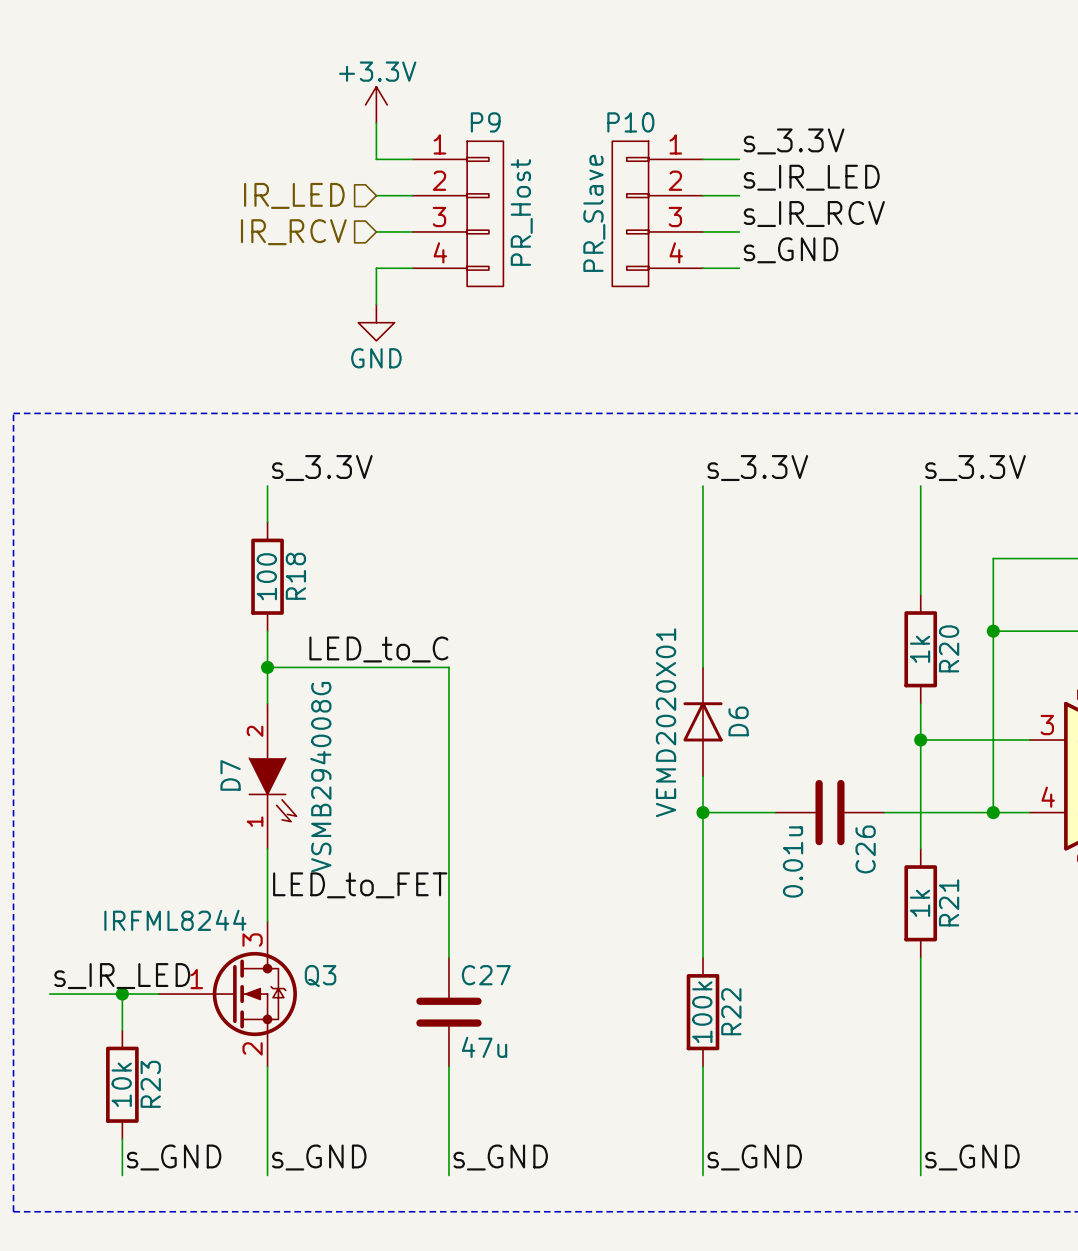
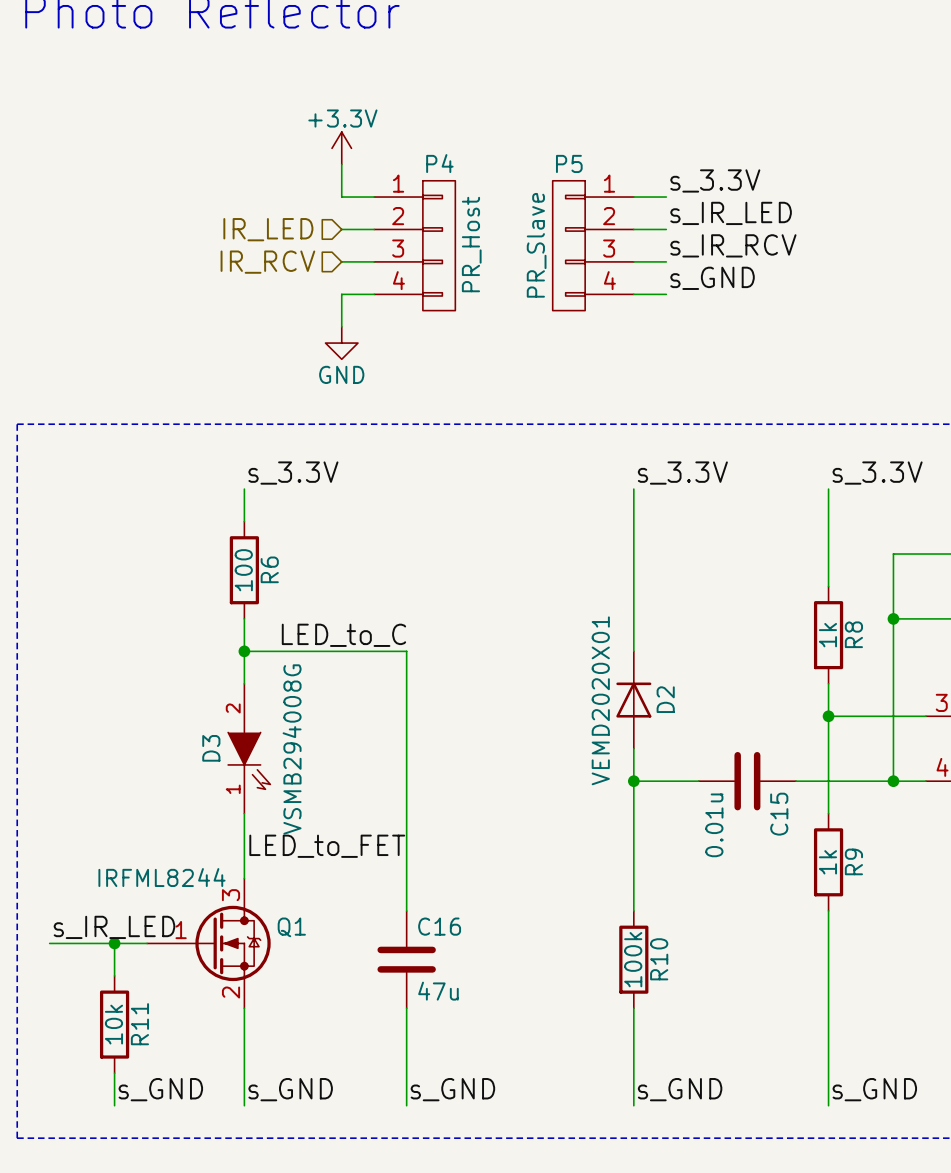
P9 name: P9 (485, 122) -> P4 (439, 163)
P10 name: P10 (630, 122) -> P5 (569, 163)
R18 name: R18 (295, 576) -> R6 (269, 569)
R20 name: R20 (949, 648) -> R8 (853, 634)
D6 name: D6 (738, 721) -> D2 (665, 699)
D7 name: D7 (230, 775) -> D3 (211, 748)
C26 name: C26 (865, 849) -> C15 (779, 814)
R21 name: R21 (949, 902) -> R9 (853, 861)
C27 name: C27 (486, 975) -> C16 (439, 926)
Q3 name: Q3 (320, 976) -> Q1 (291, 927)
R22 name: R22 (731, 1011) -> R10 (659, 959)
R23 name: R23 (150, 1084) -> R11 (139, 1024)

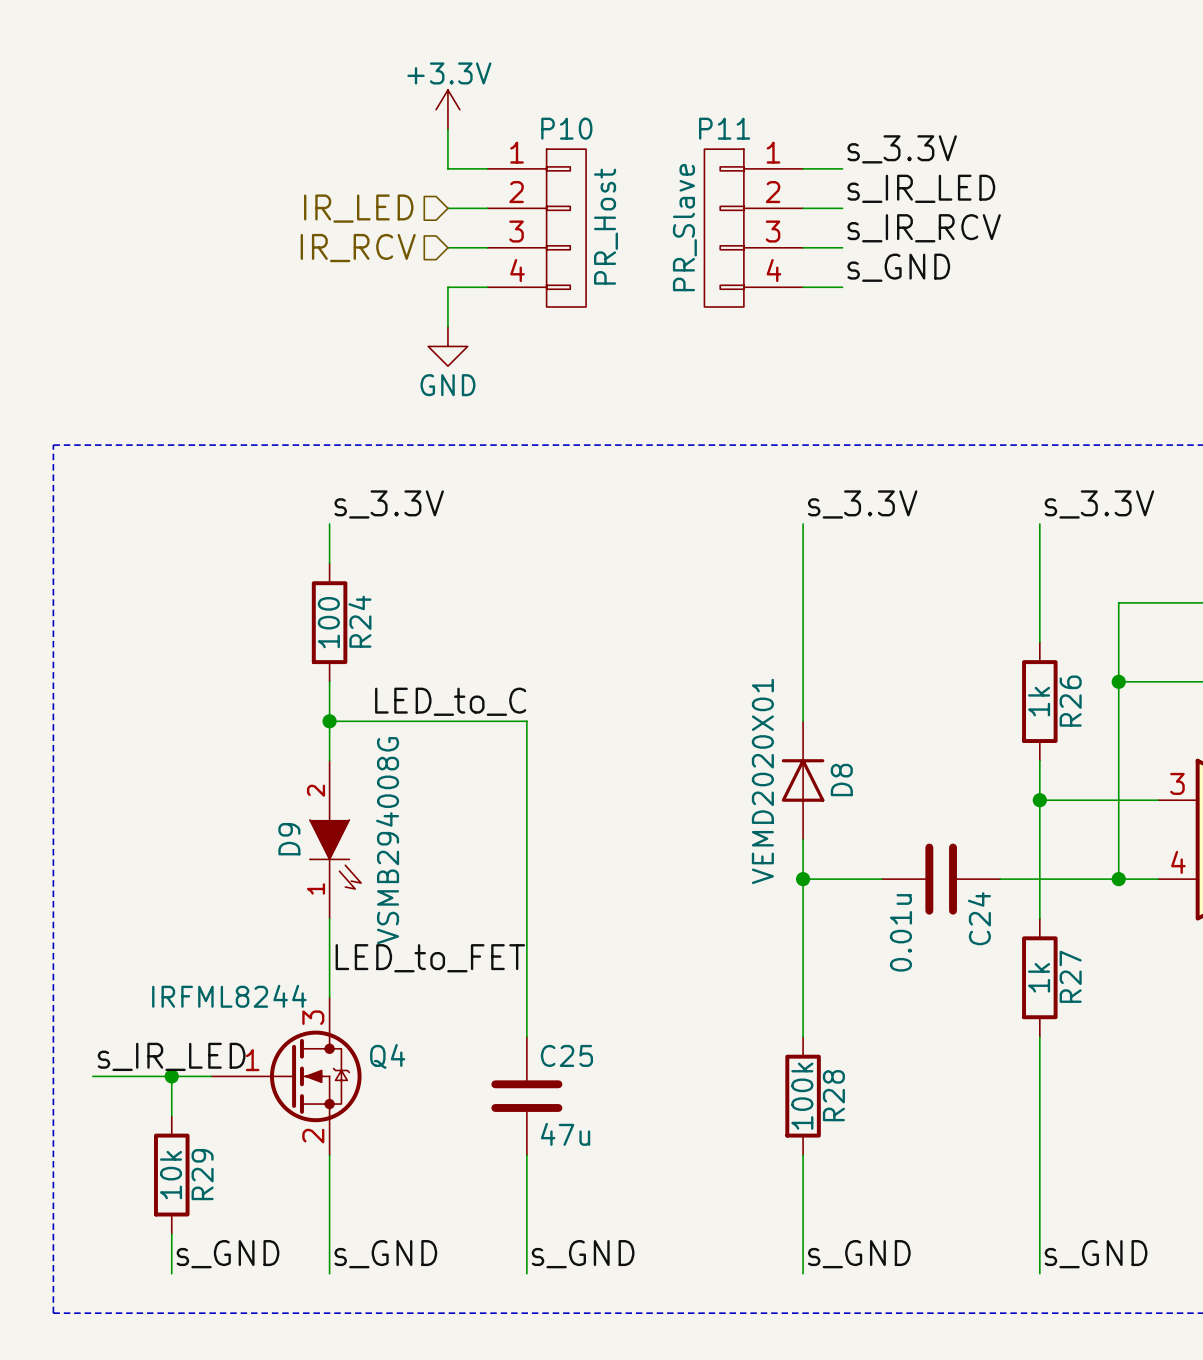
P4 name: P4 (439, 163) -> P10 (566, 128)
P5 name: P5 (569, 163) -> P11 (724, 128)
R6 name: R6 (269, 569) -> R24 (359, 621)
R8 name: R8 (853, 634) -> R26 (1070, 701)
D2 name: D2 (665, 699) -> D8 (841, 780)
D3 name: D3 (211, 748) -> D9 (289, 839)
C15 name: C15 (779, 814) -> C24 (979, 918)
R9 name: R9 (853, 861) -> R27 (1070, 976)
C16 name: C16 (439, 926) -> C25 (566, 1055)
Q1 name: Q1 (291, 927) -> Q4 (387, 1056)
R10 name: R10 (659, 959) -> R28 (833, 1095)
R11 name: R11 (139, 1024) -> R29 (202, 1174)

